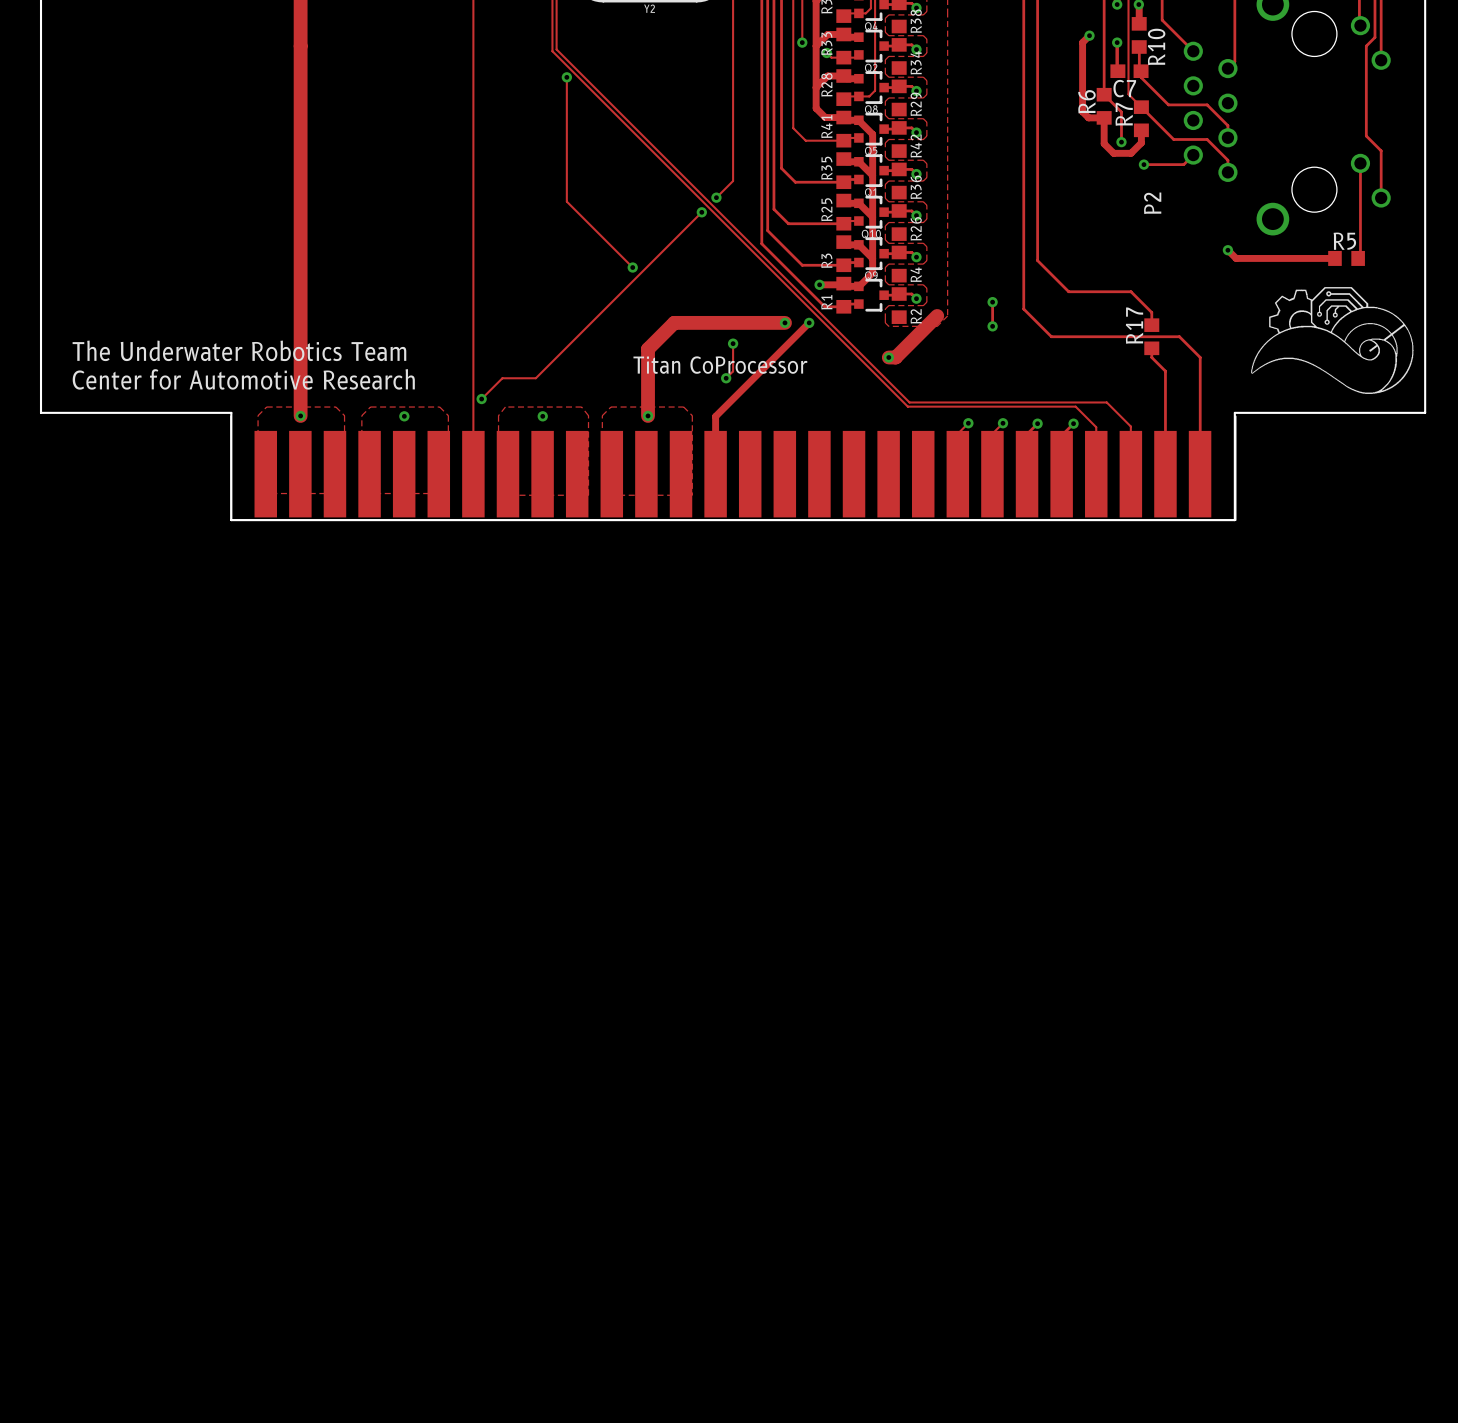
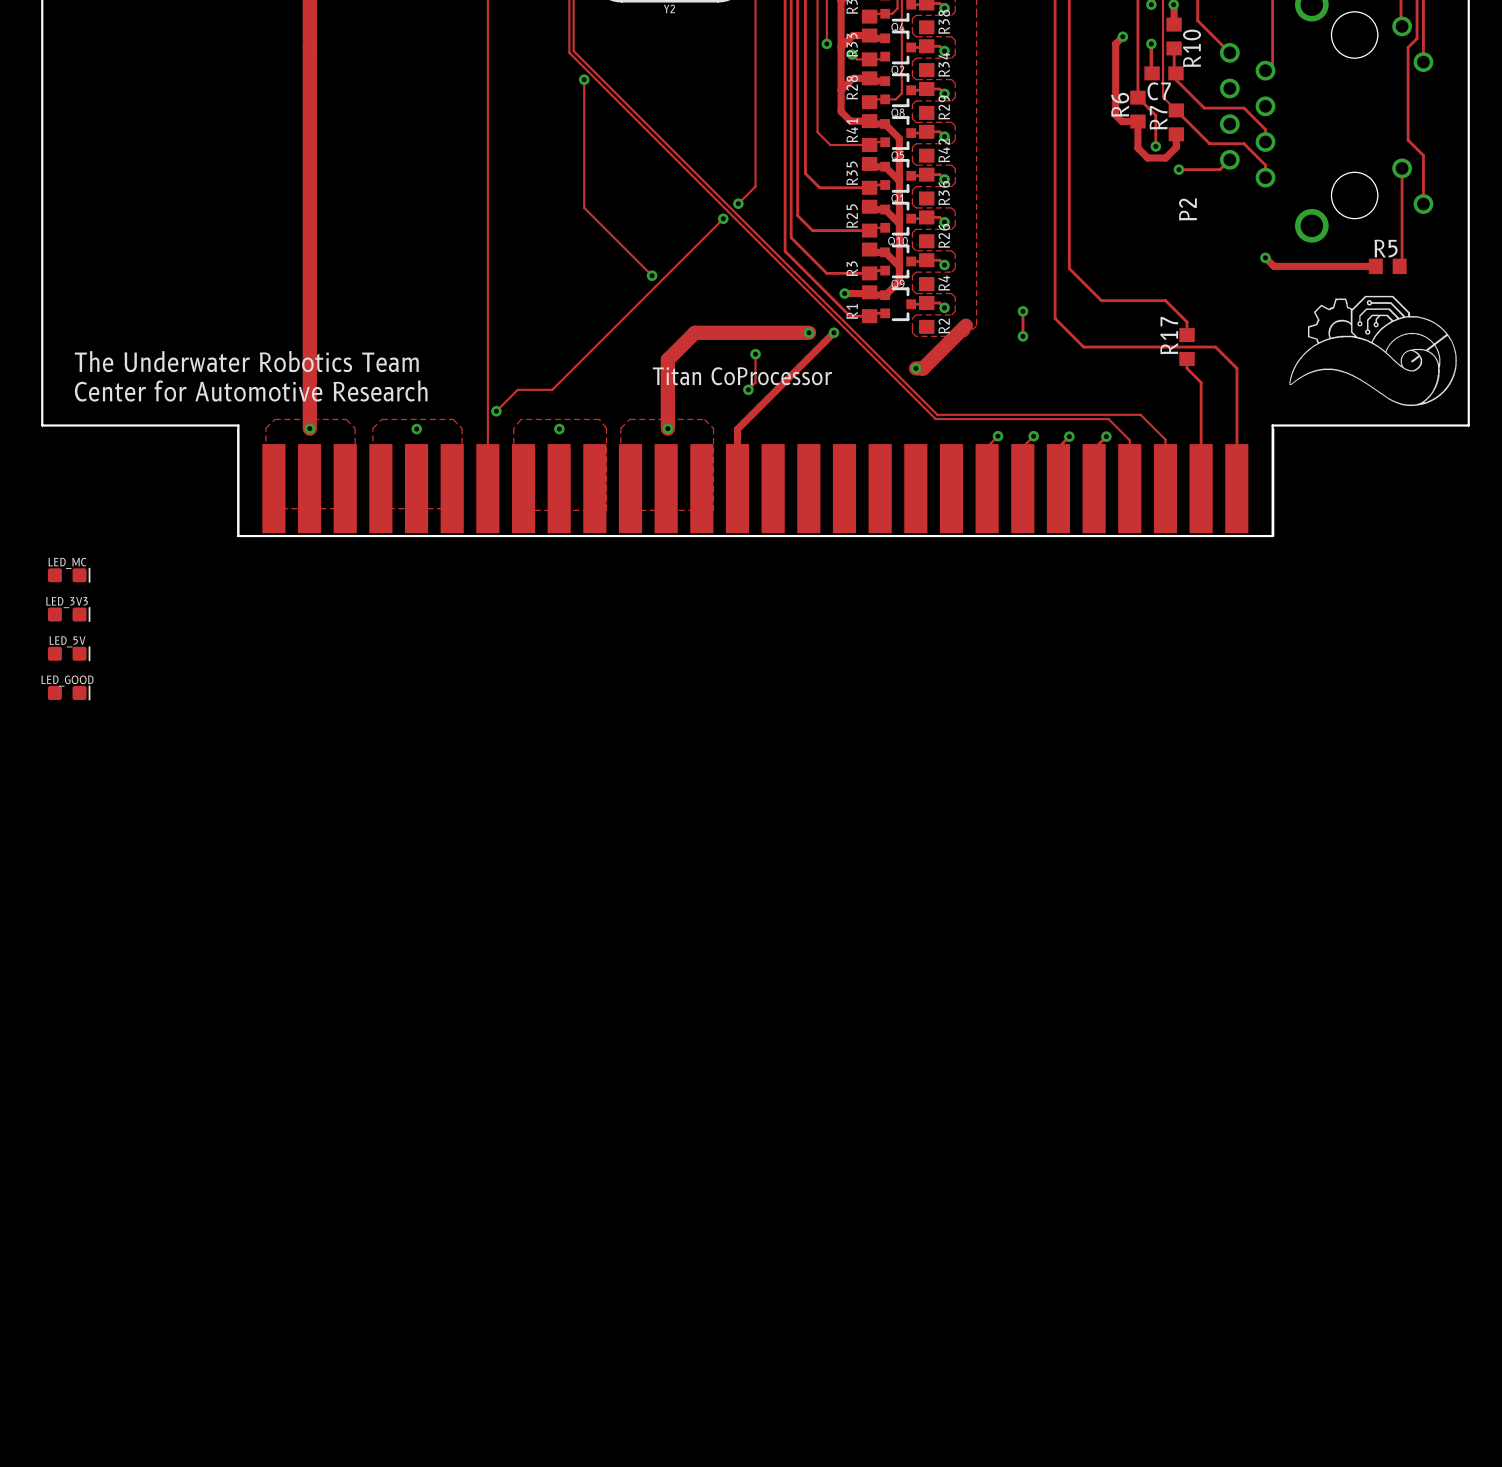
LED_MC: none -> (69, 575)
LED_3V3: none -> (69, 614)
LED_5V: none -> (69, 653)
LED_GOOD: none -> (69, 692)

